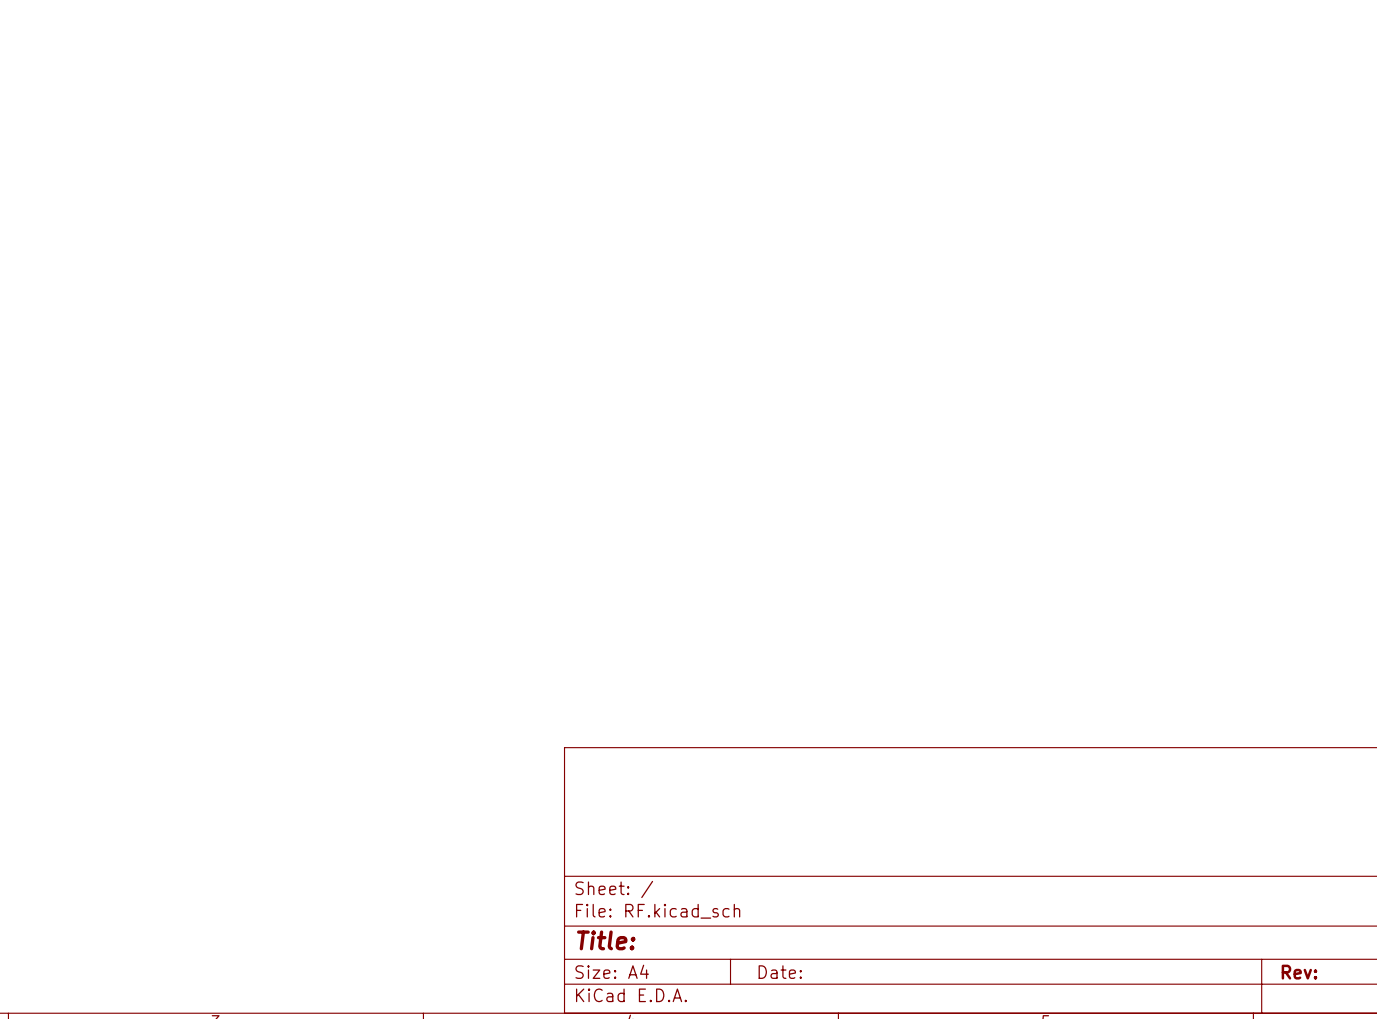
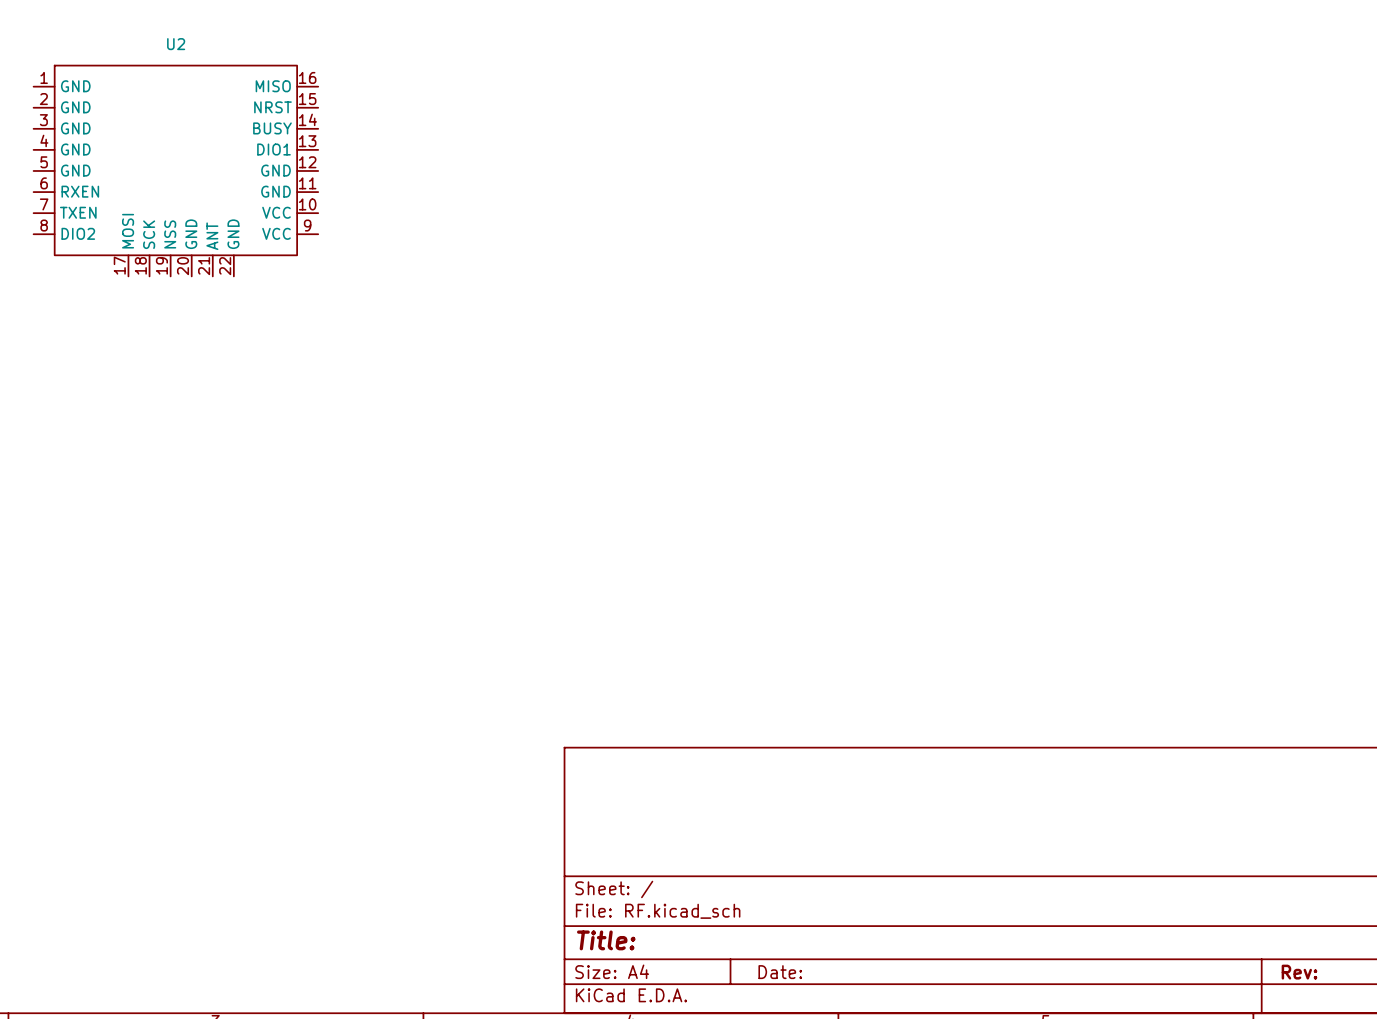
U2: none -> (175, 170)

